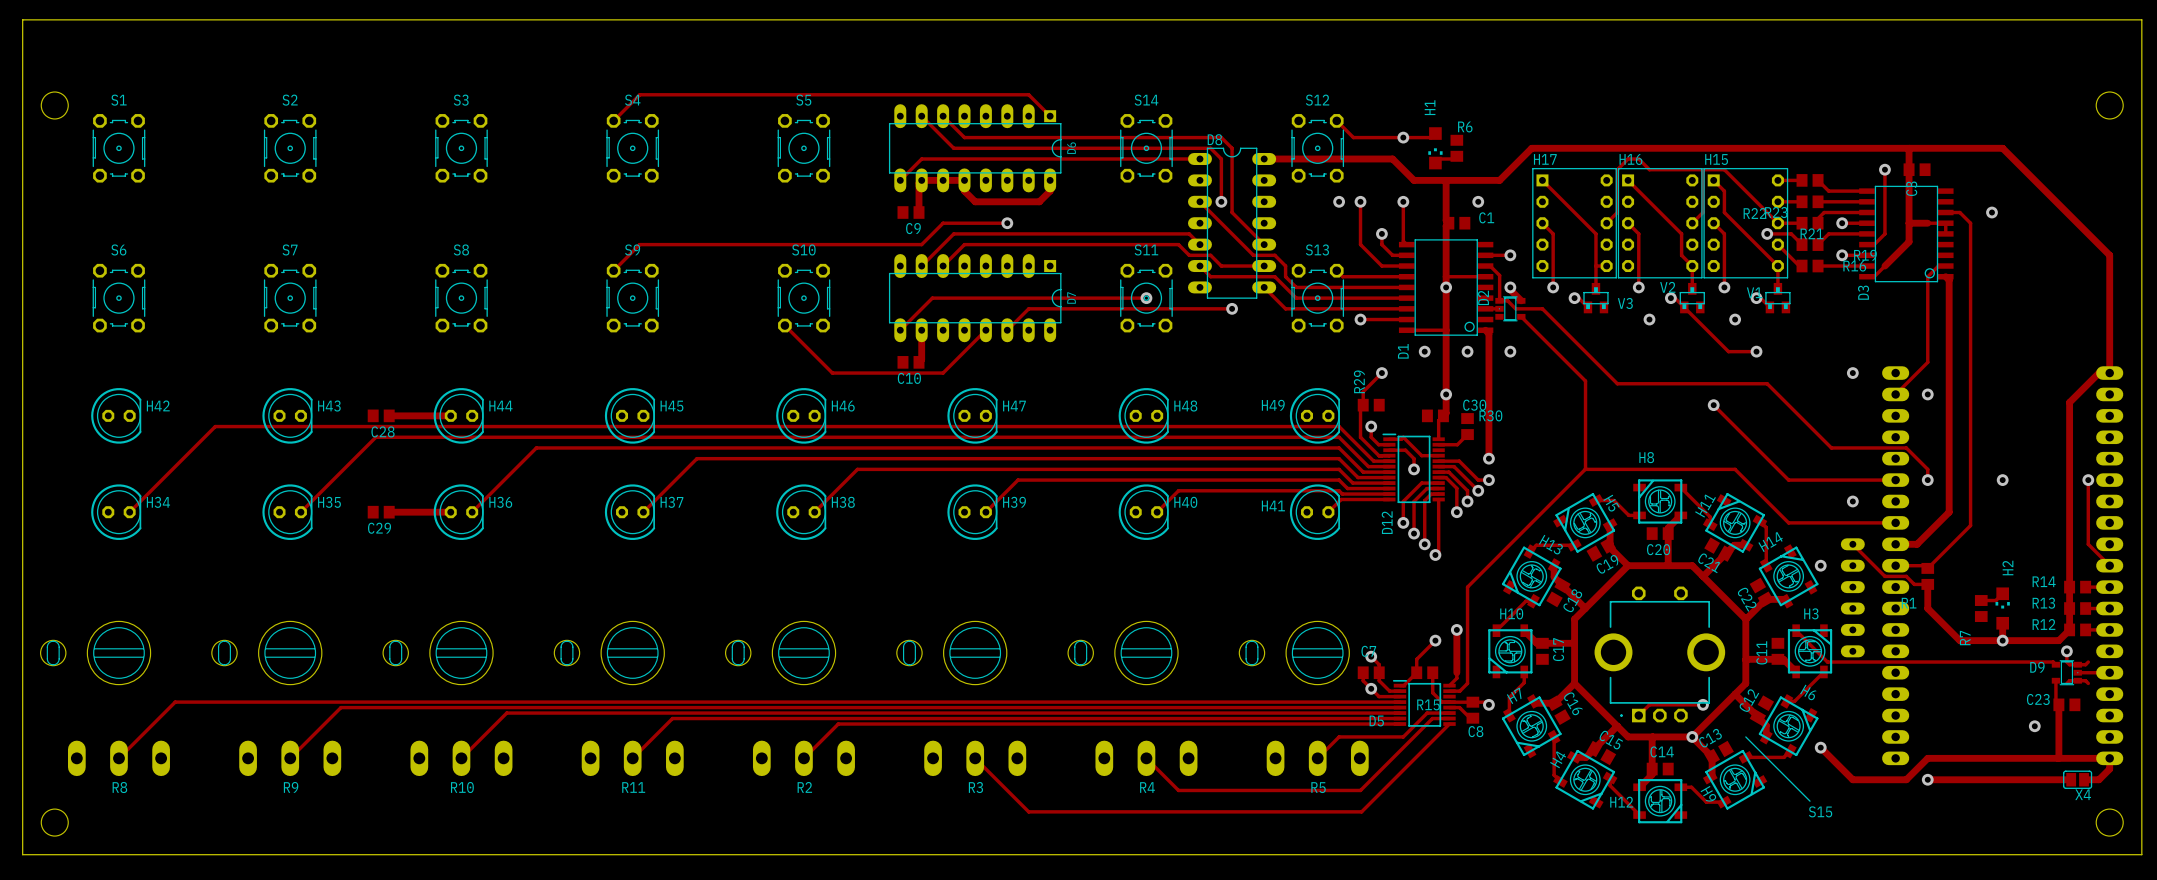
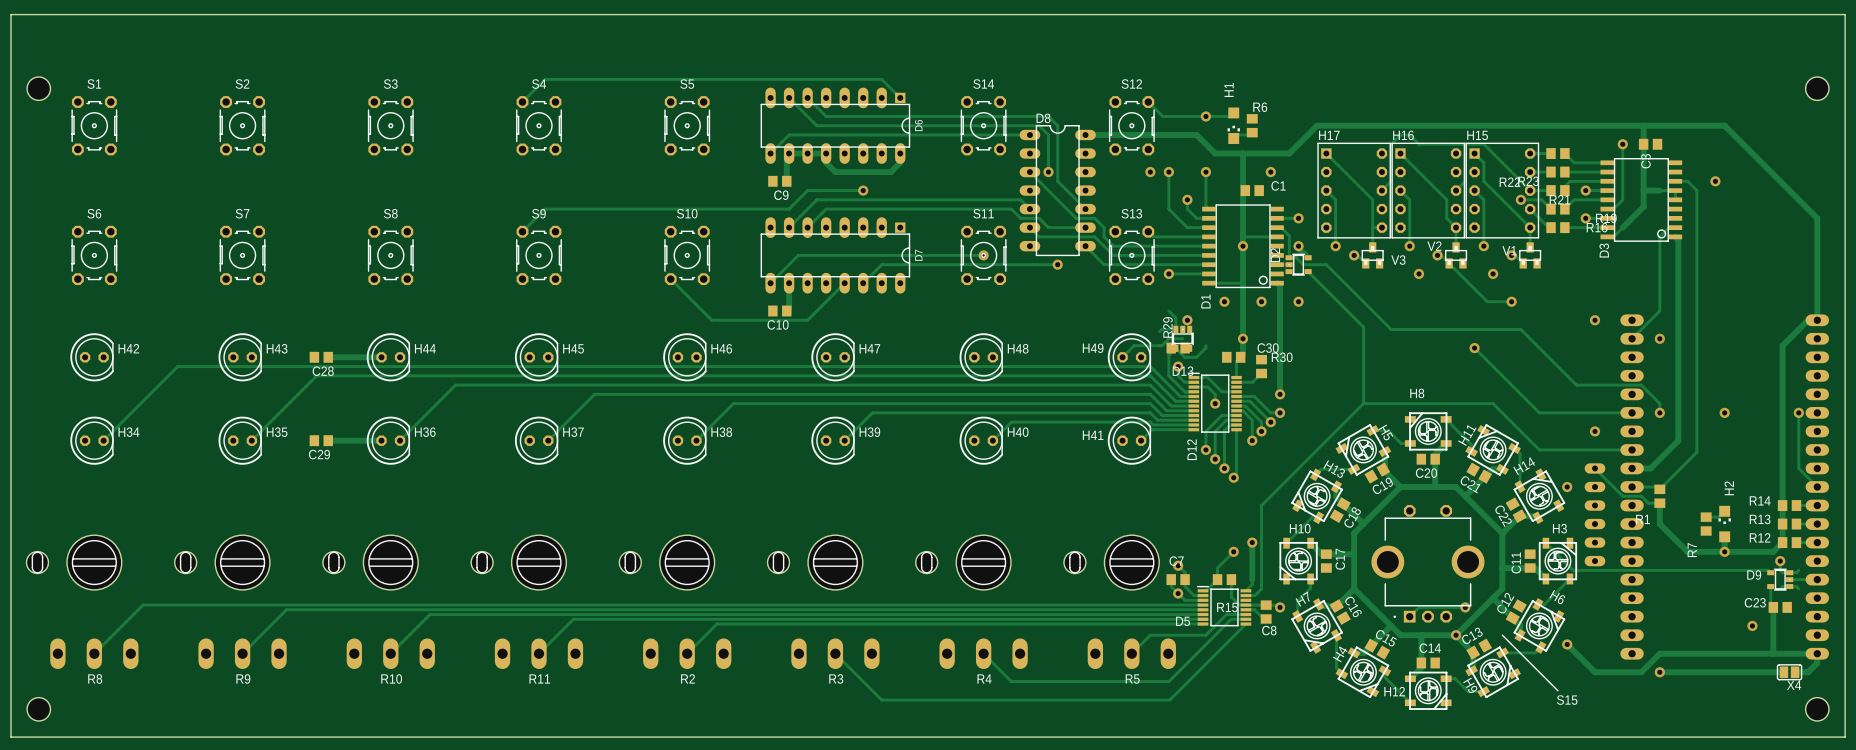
track: none -> (1168, 311) (1175, 317) (1175, 329) (1162, 329) (1159, 331)
track: (1381, 373) (1363, 391) (1363, 405) (1360, 407) (1360, 413) -> (1205, 345) (1196, 357) (1184, 357) (1175, 348) (1168, 355)
track: none -> (1182, 338) (1168, 338) (1161, 345) (1134, 345) (1122, 357)
D13: none -> (1182, 338)

